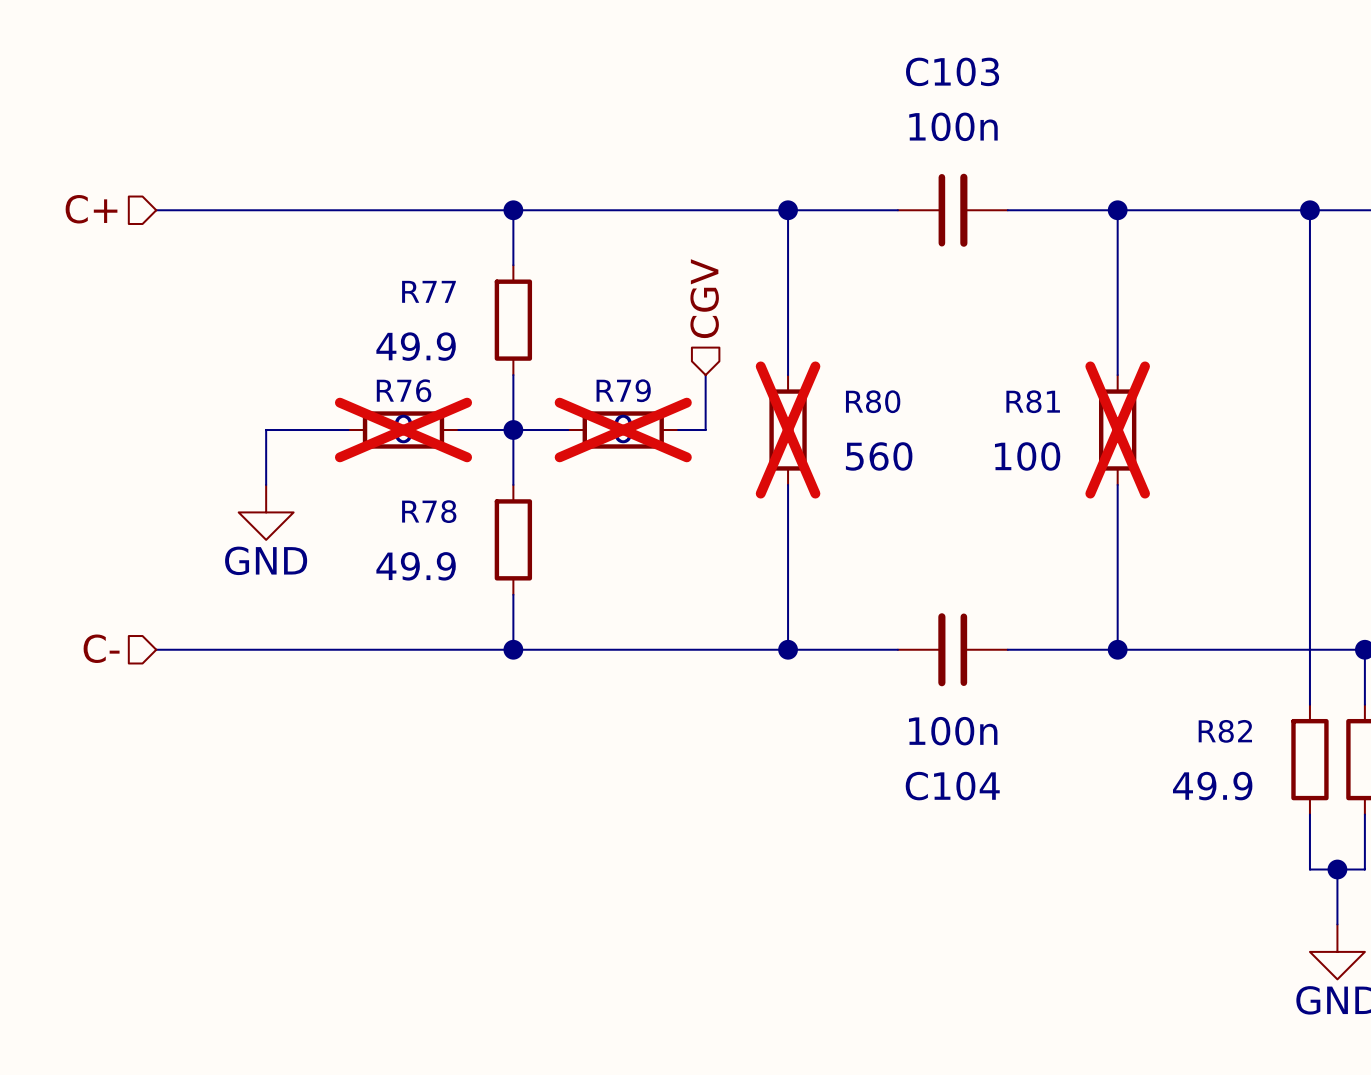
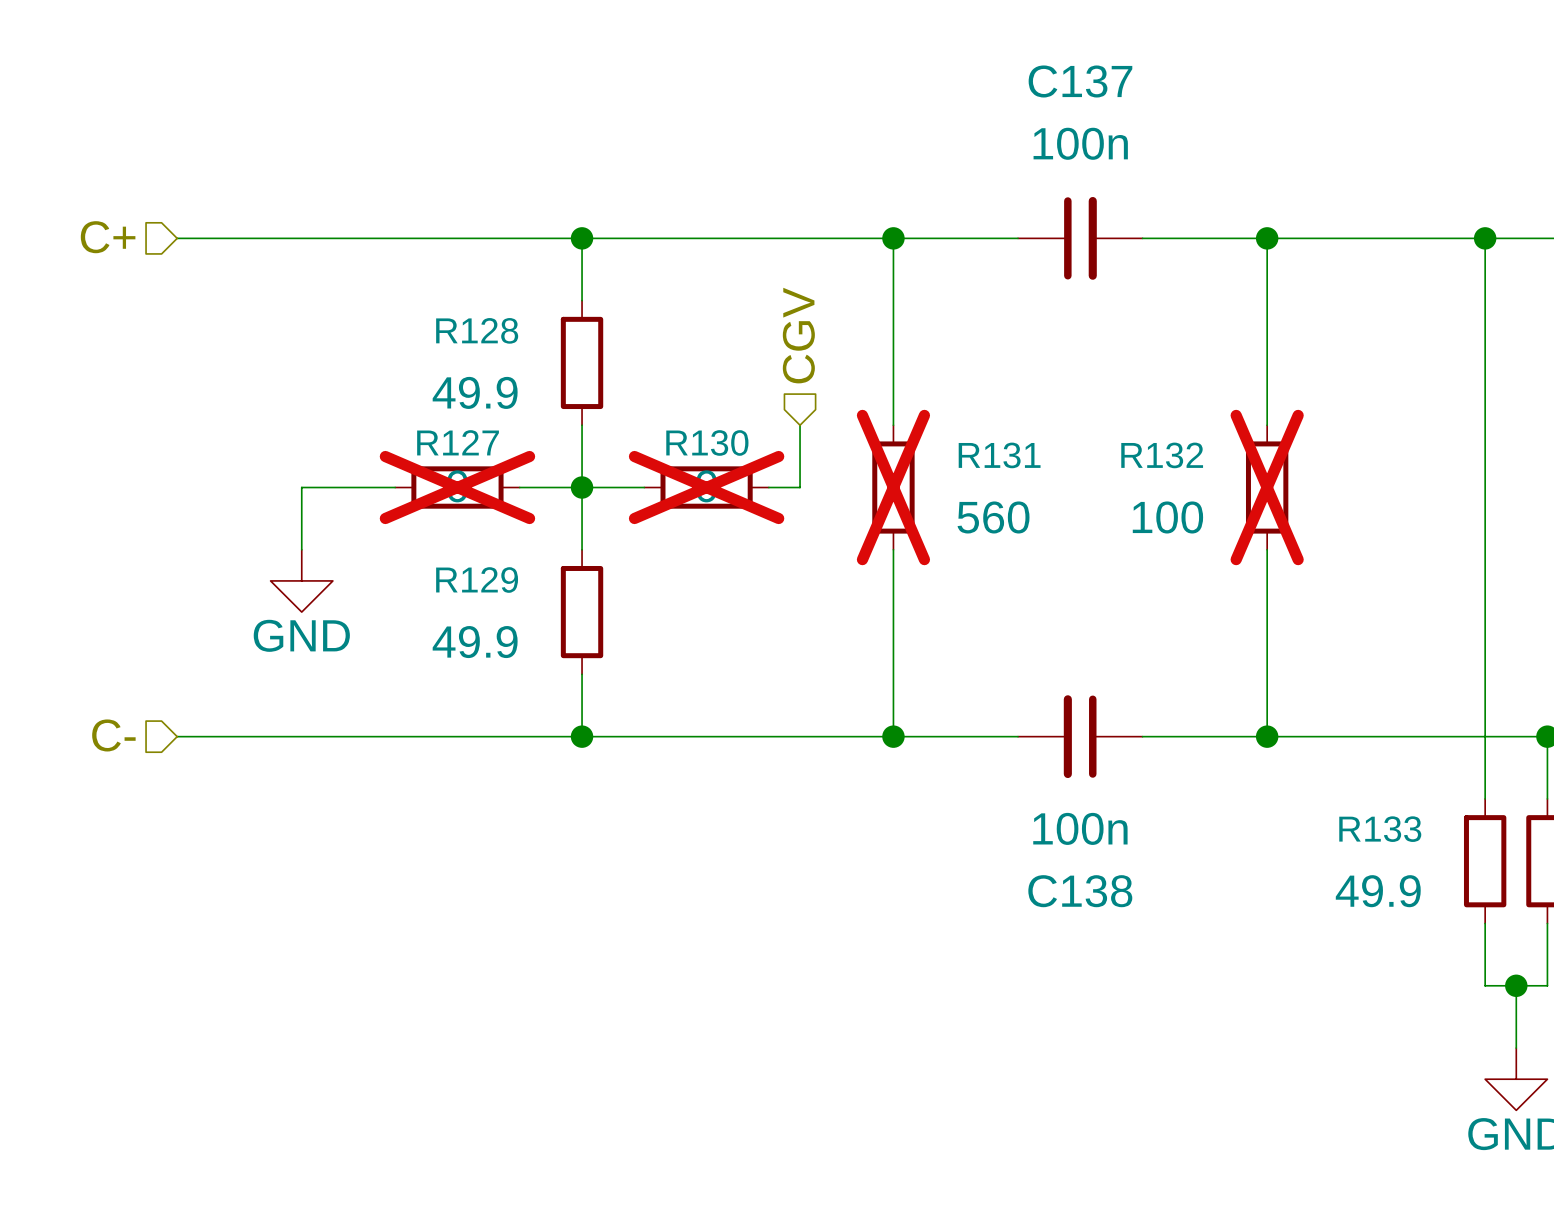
C103 name: C103 (952, 71) -> C137 (1080, 81)
R77 name: R77 (428, 291) -> R128 (477, 330)
R76 name: R76 (404, 390) -> R127 (458, 442)
R79 name: R79 (623, 390) -> R130 (707, 442)
R80 name: R80 (873, 401) -> R131 (999, 455)
R81 name: R81 (1033, 401) -> R132 (1162, 455)
R78 name: R78 (429, 511) -> R129 (477, 580)
R82 name: R82 (1225, 731) -> R133 (1380, 829)
C104 name: C104 (952, 786) -> C138 (1080, 891)

